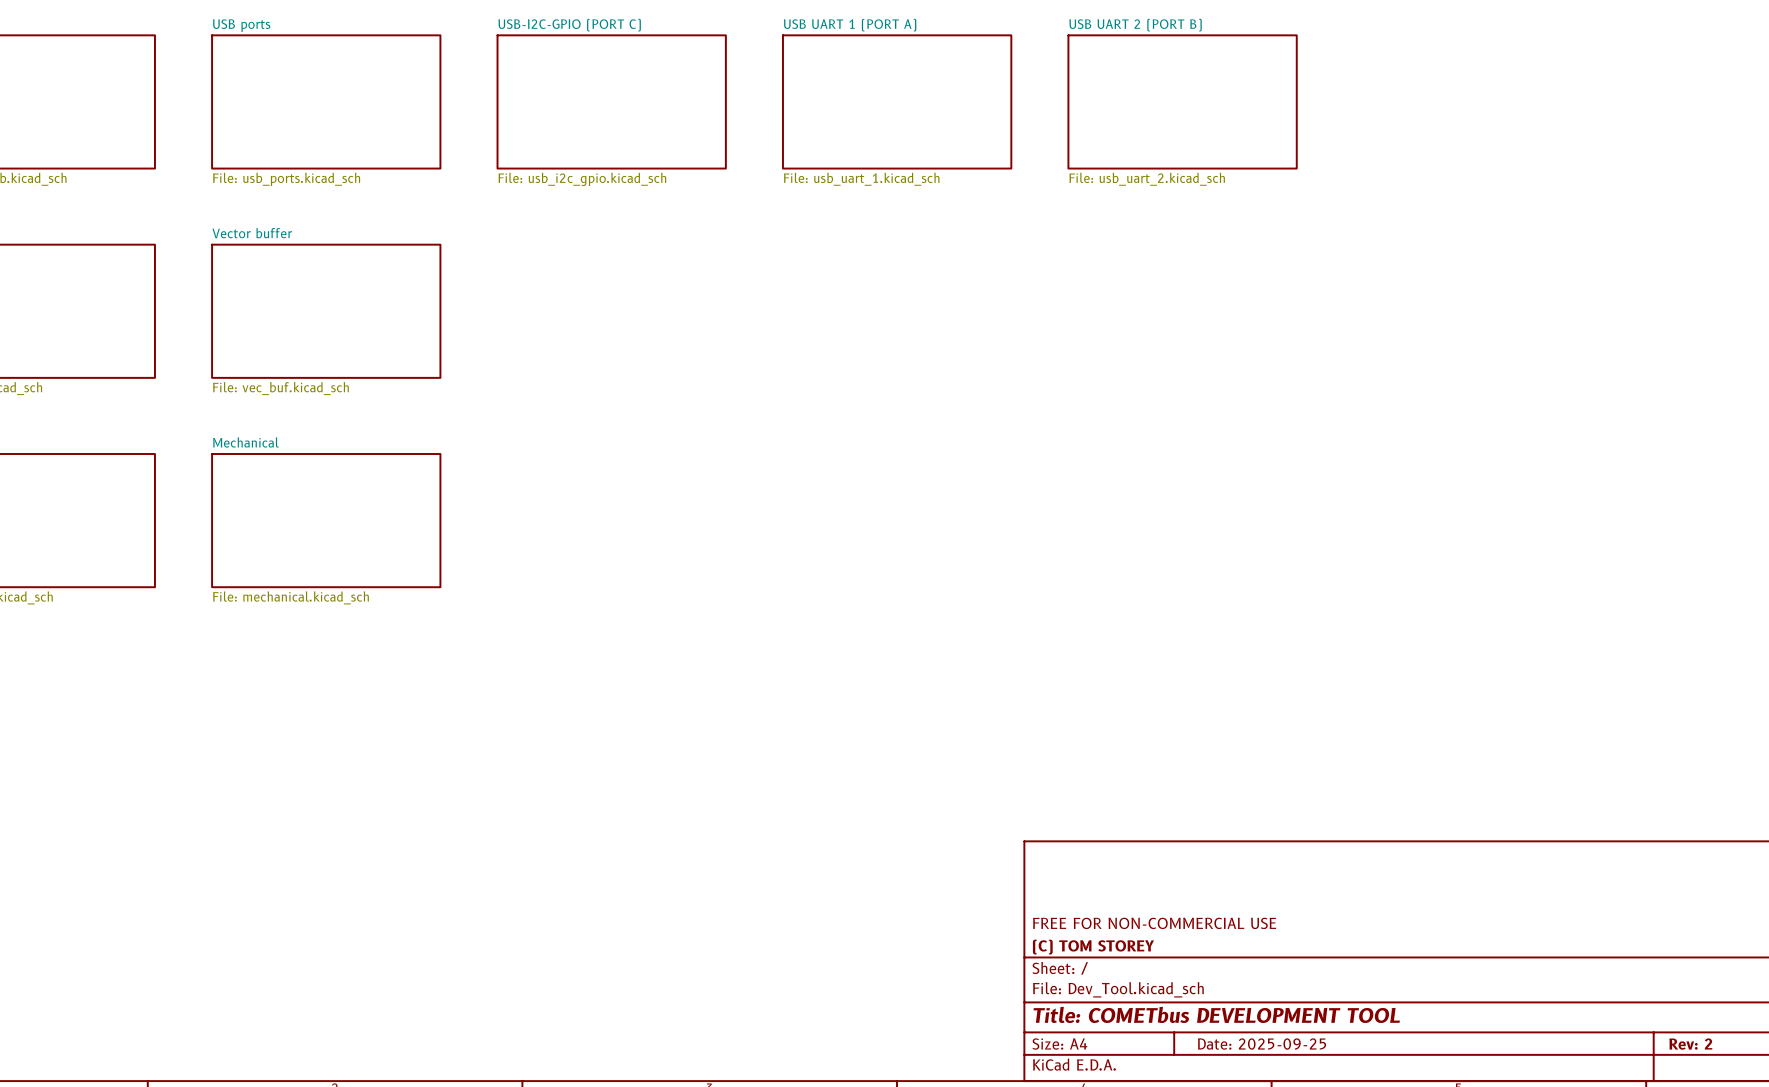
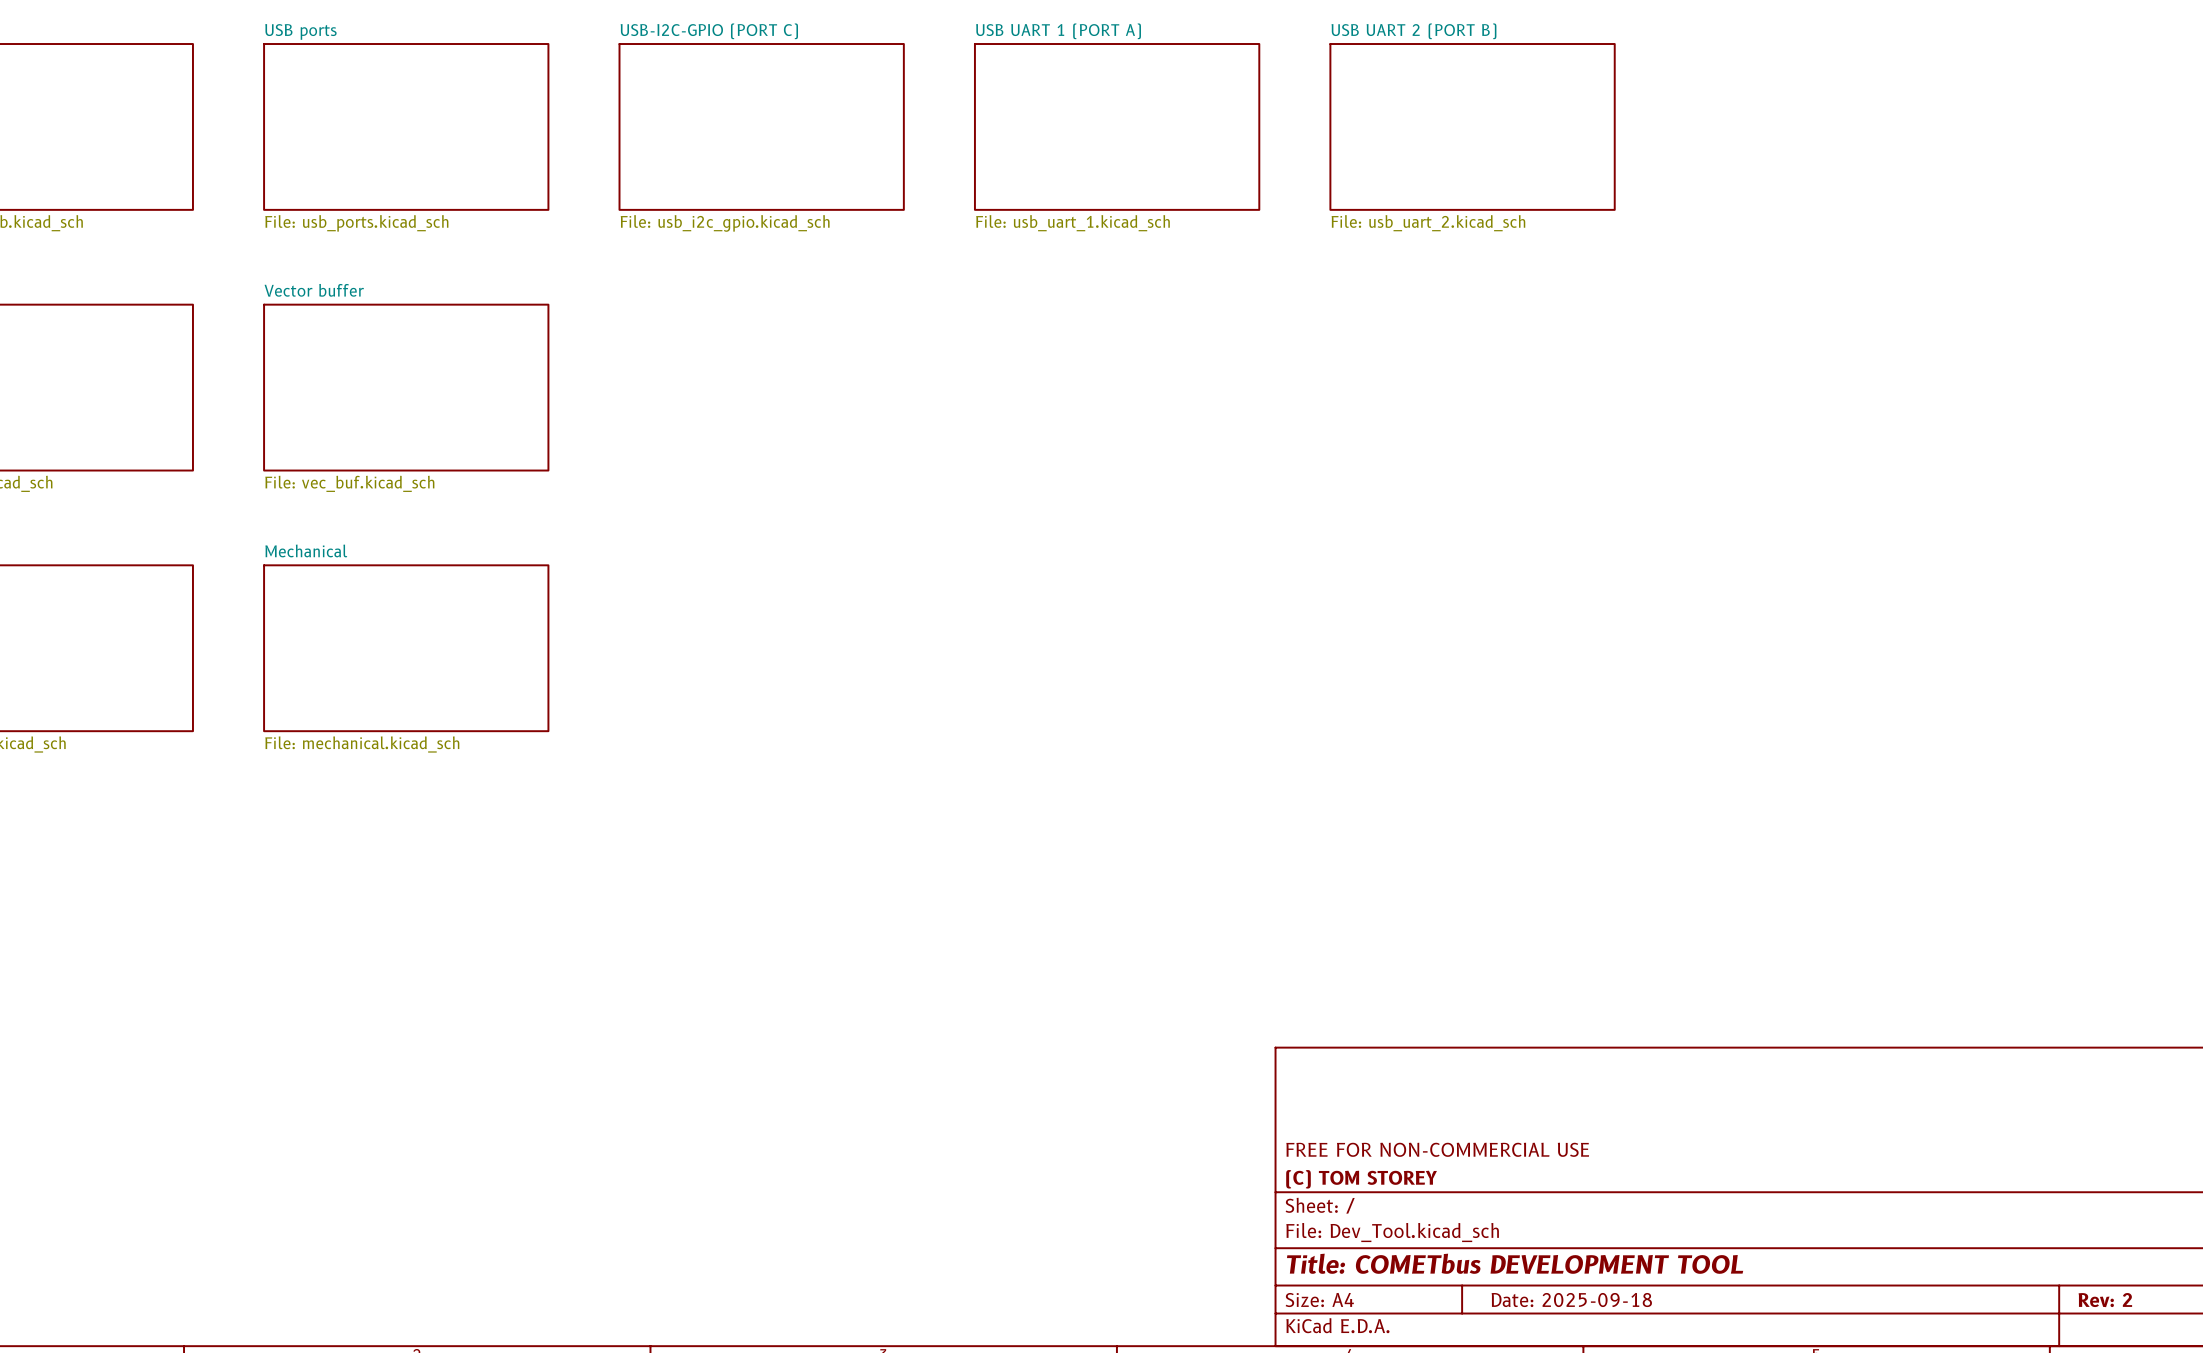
title block: Date: 2025-09-25 (1262, 1044) -> Date: 2025-09-18 (1571, 1300)

